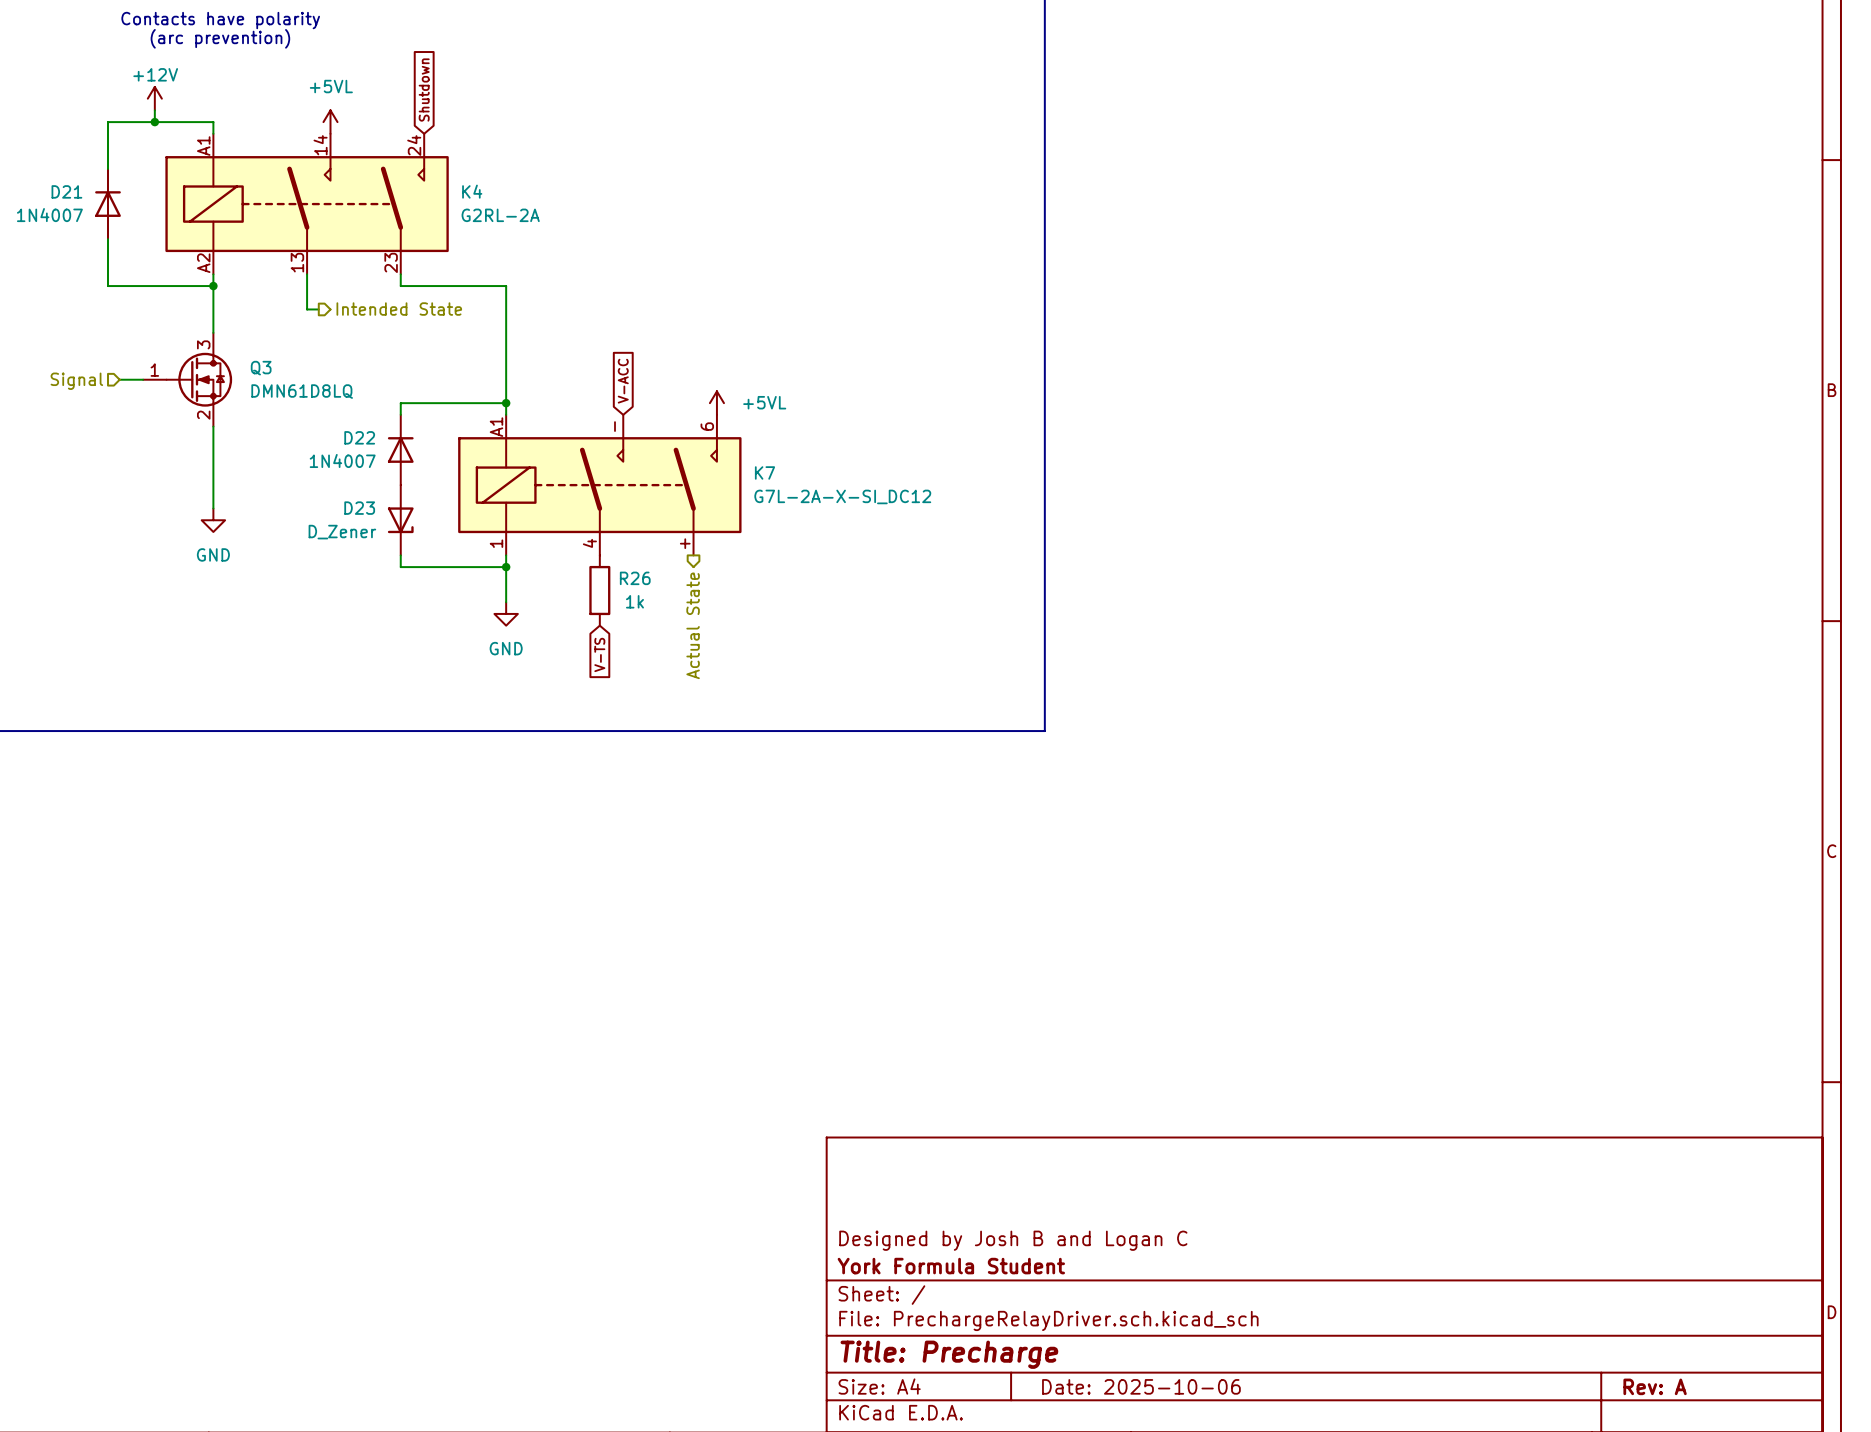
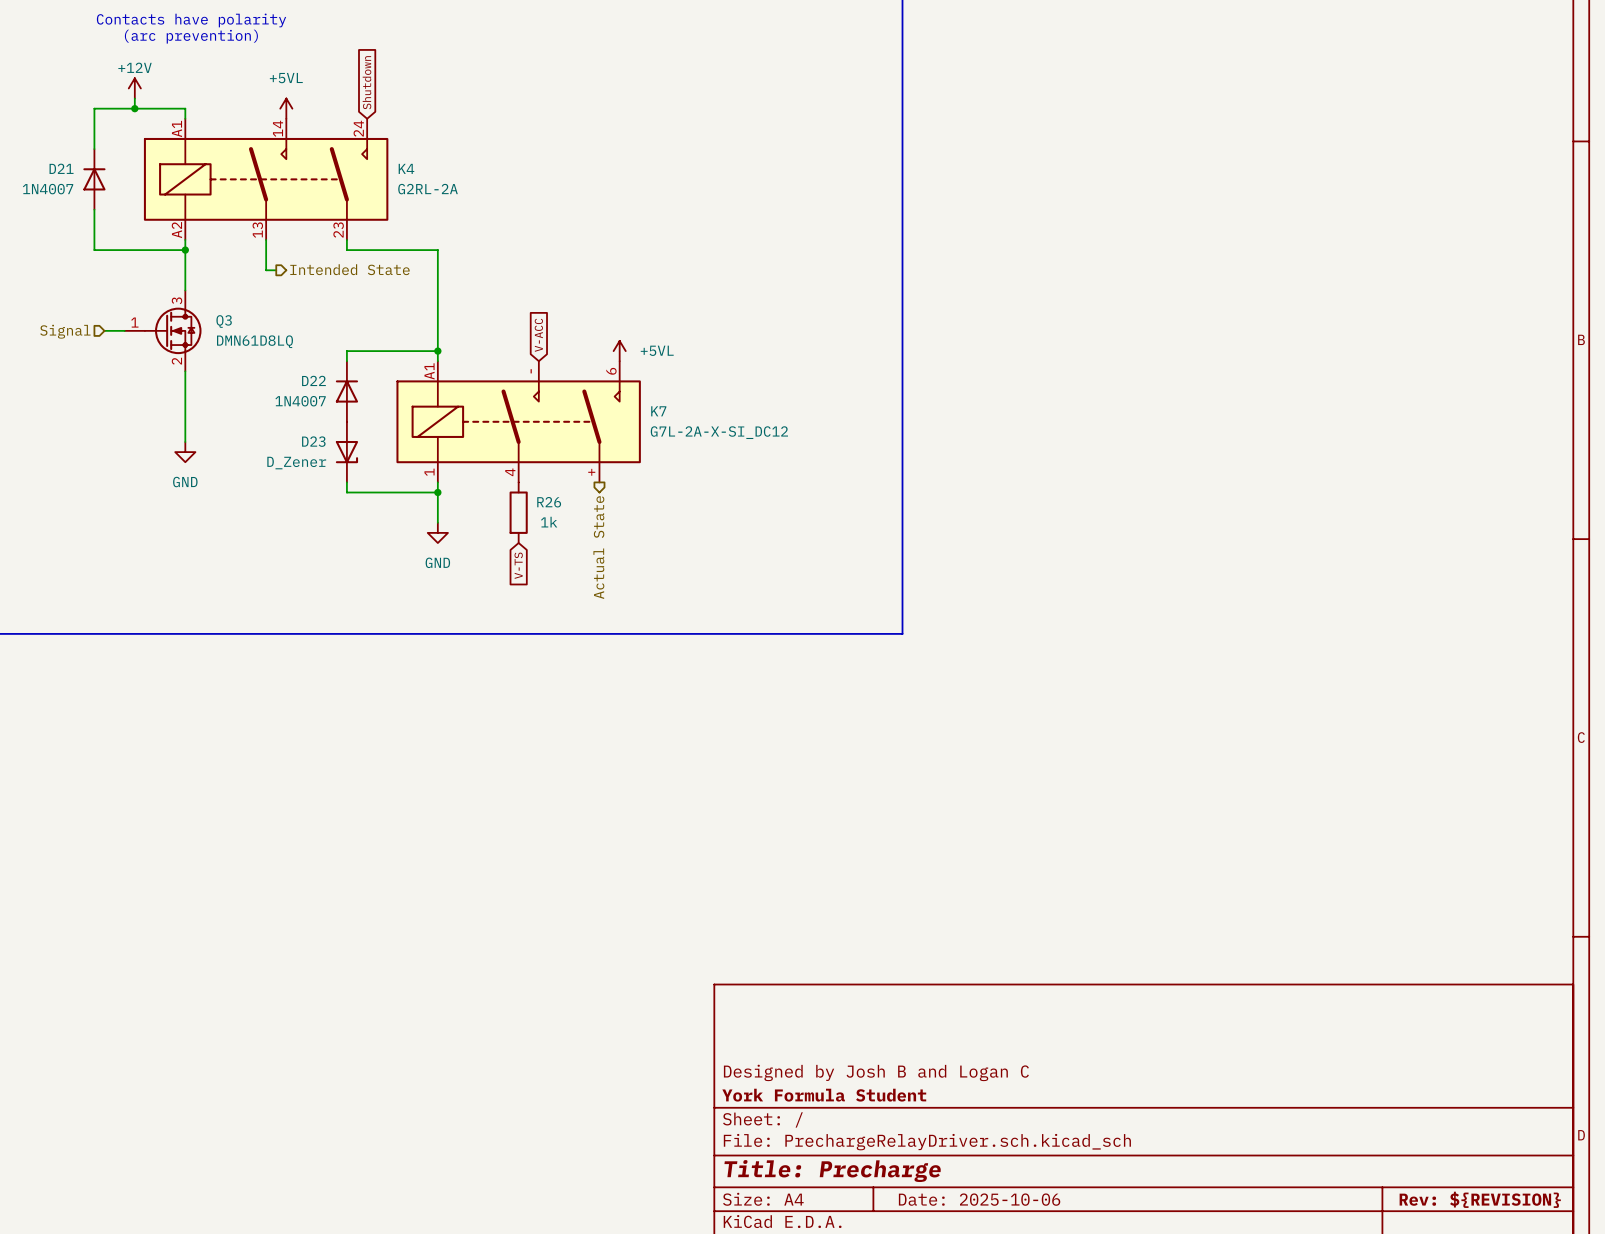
title block: Rev: A (1655, 1386) -> Rev: ${REVISION} (1480, 1199)

